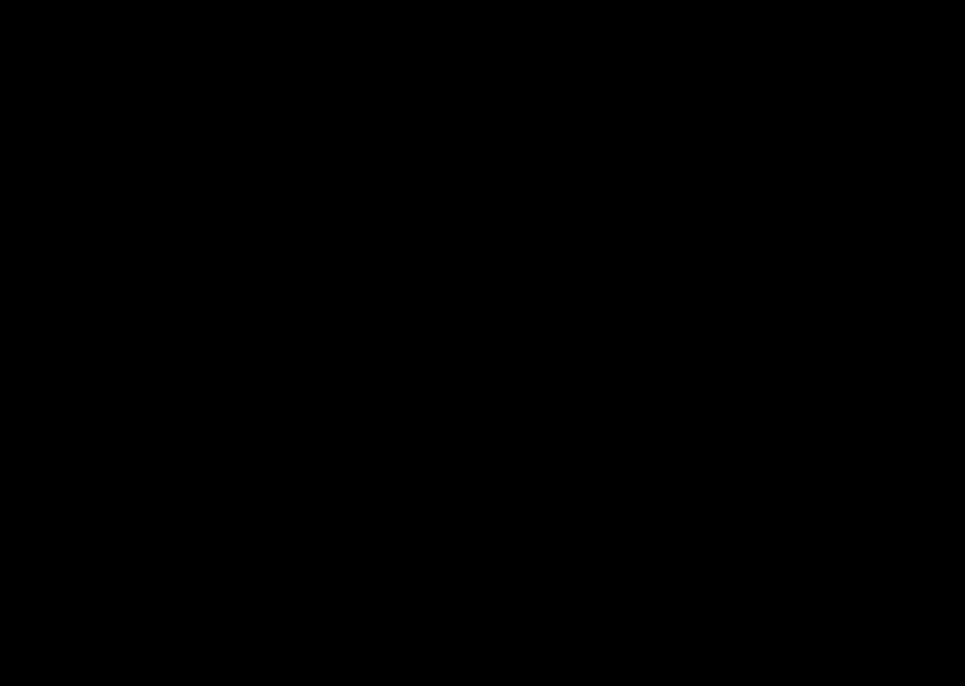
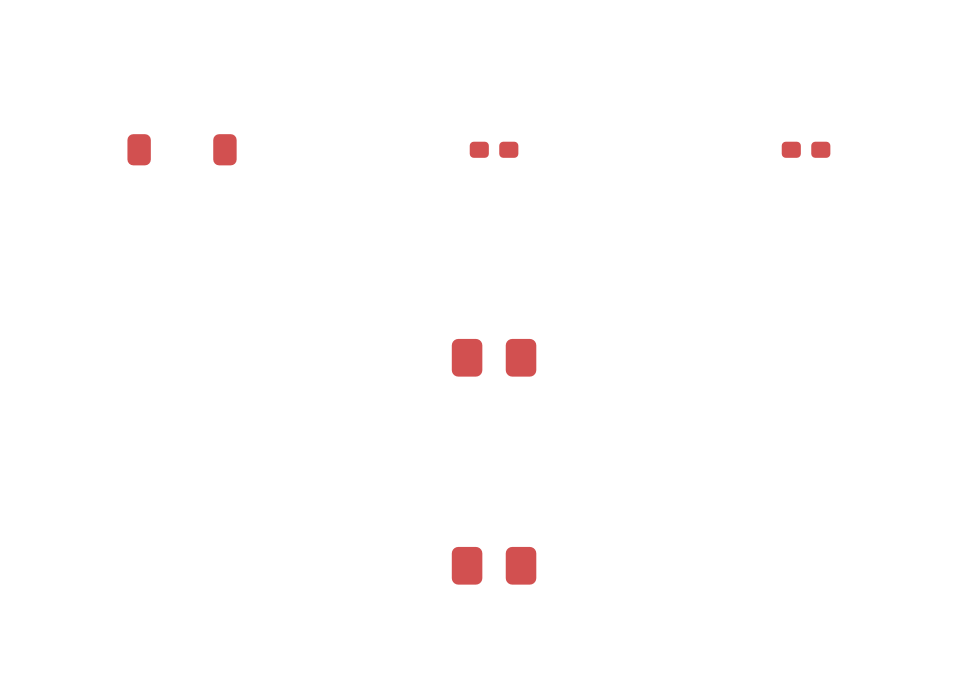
part: none -> (182, 149)
part: none -> (494, 149)
part: none -> (806, 149)
part: none -> (494, 357)
part: none -> (494, 565)

